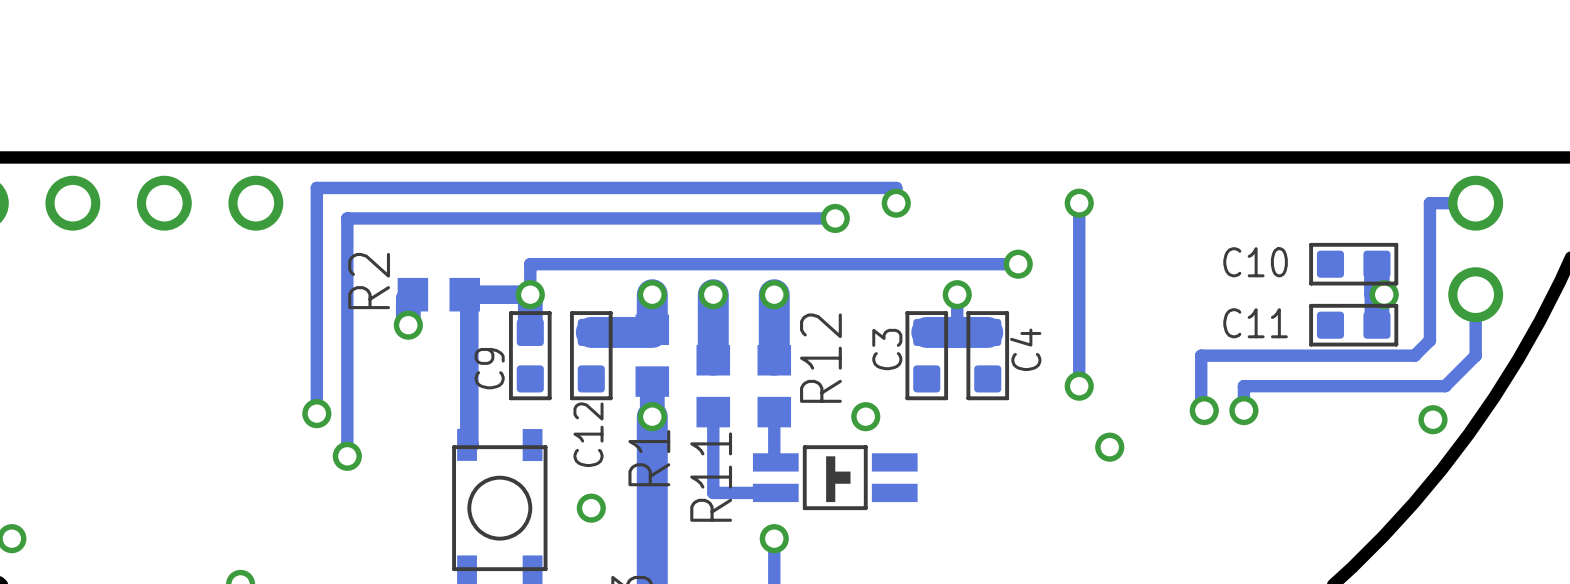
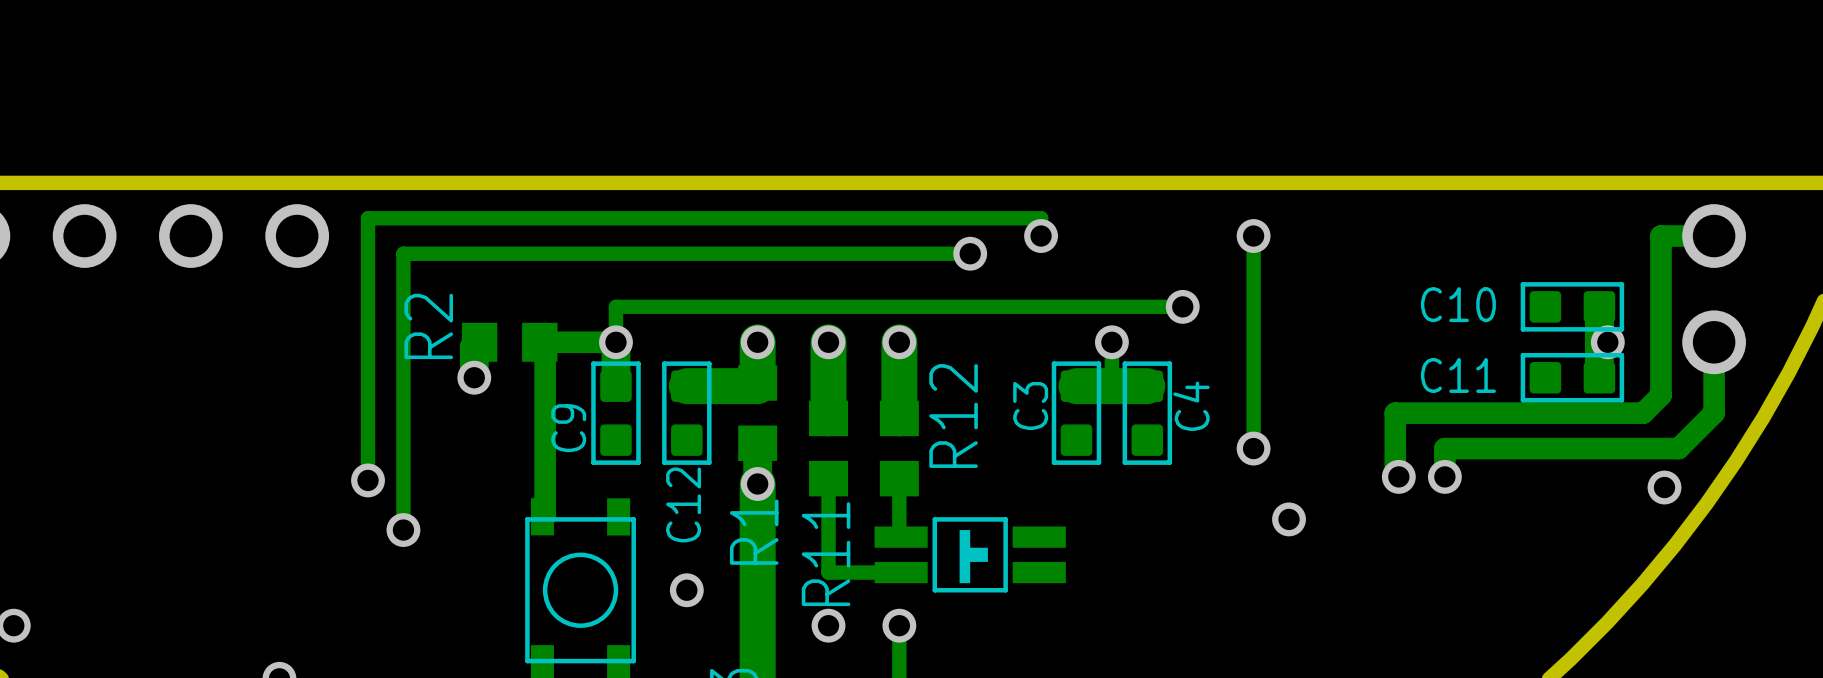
track width: thin (1475, 203) (1429, 203) (1429, 340) (1414, 355) (1201, 355) (1201, 407) -> thick (1714, 236) (1660, 236) (1660, 395) (1643, 413) (1395, 413) (1395, 473)
track width: thin (1475, 294) (1475, 355) (1445, 386) (1243, 386) (1243, 410) -> thick (1714, 342) (1714, 413) (1678, 448) (1444, 448) (1444, 476)
via: (865, 416) -> none
via: none -> (828, 625)

